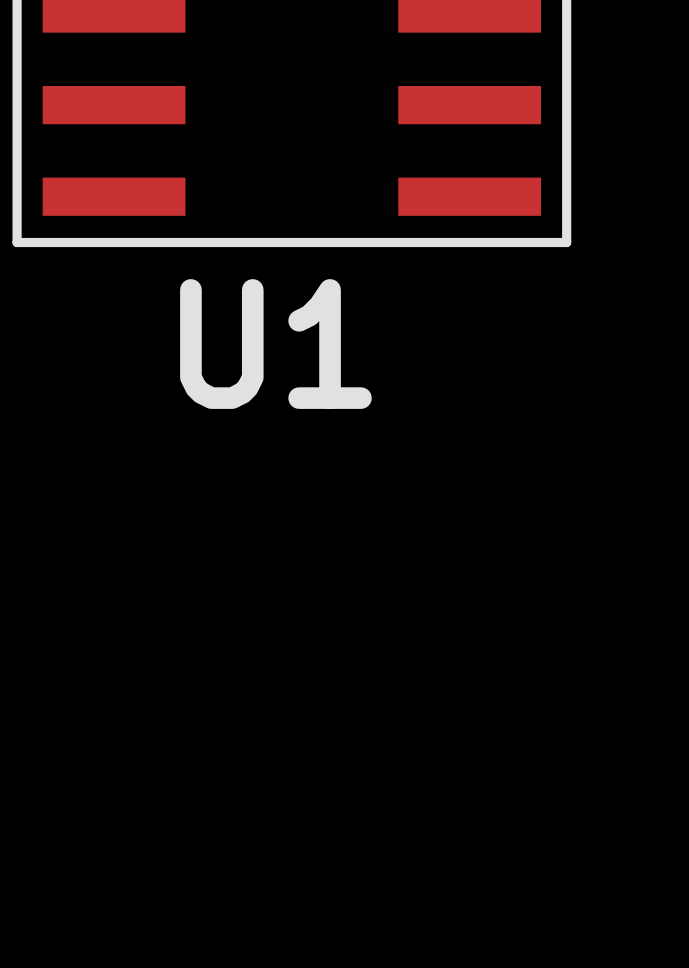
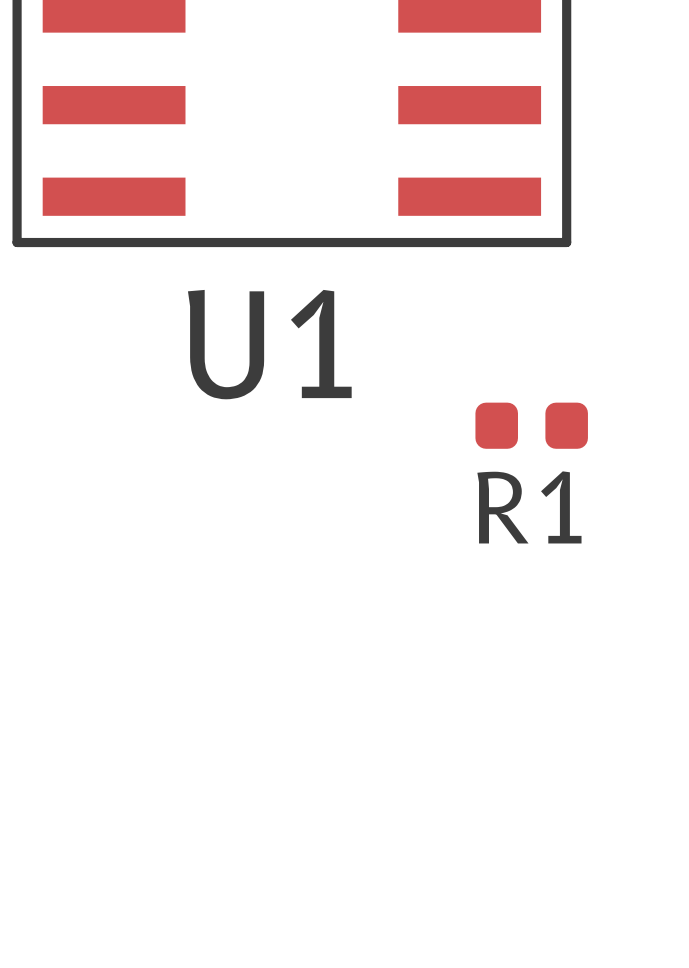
R1: none -> (531, 425)

